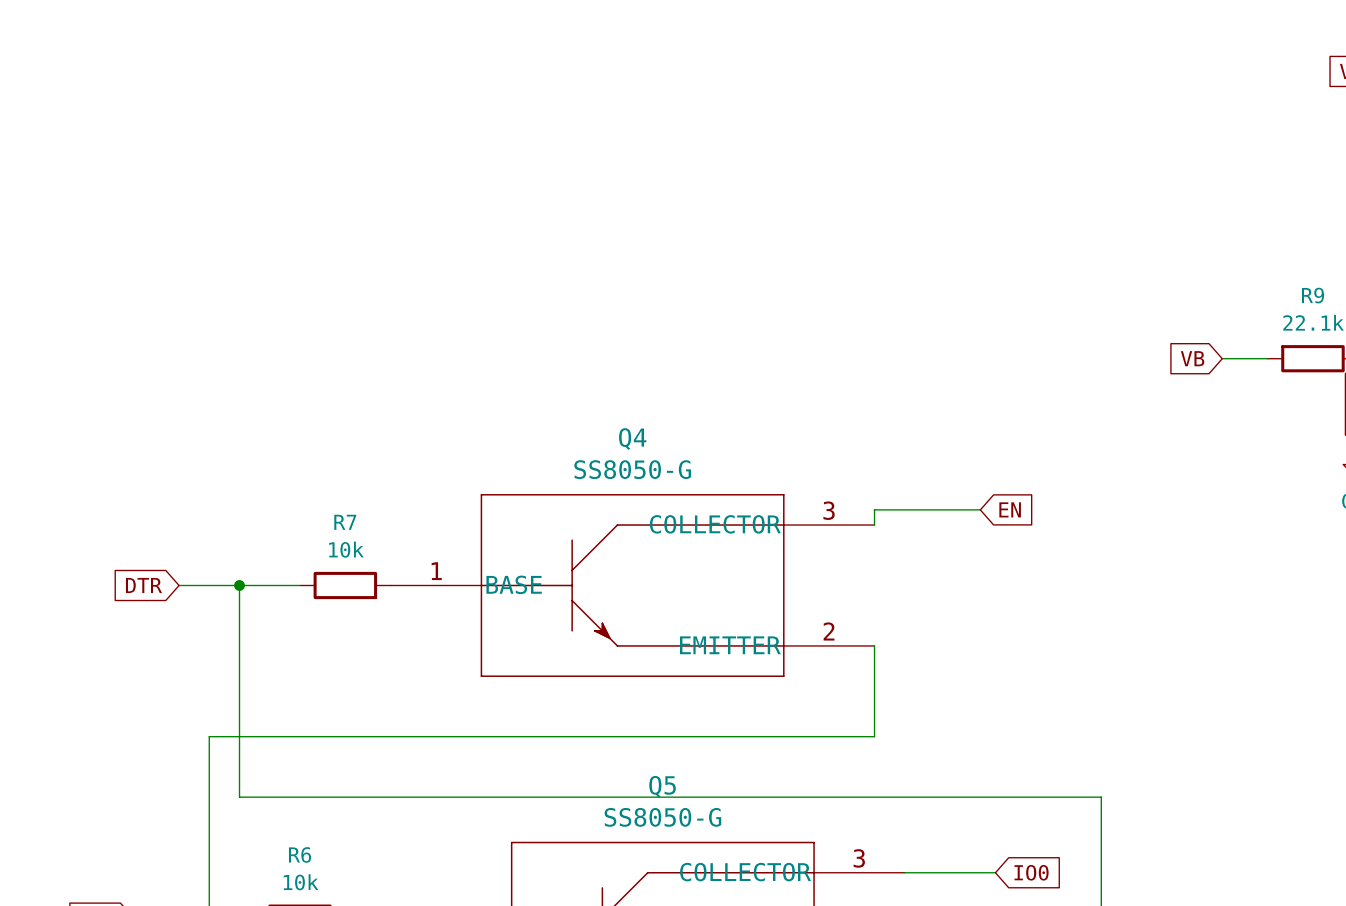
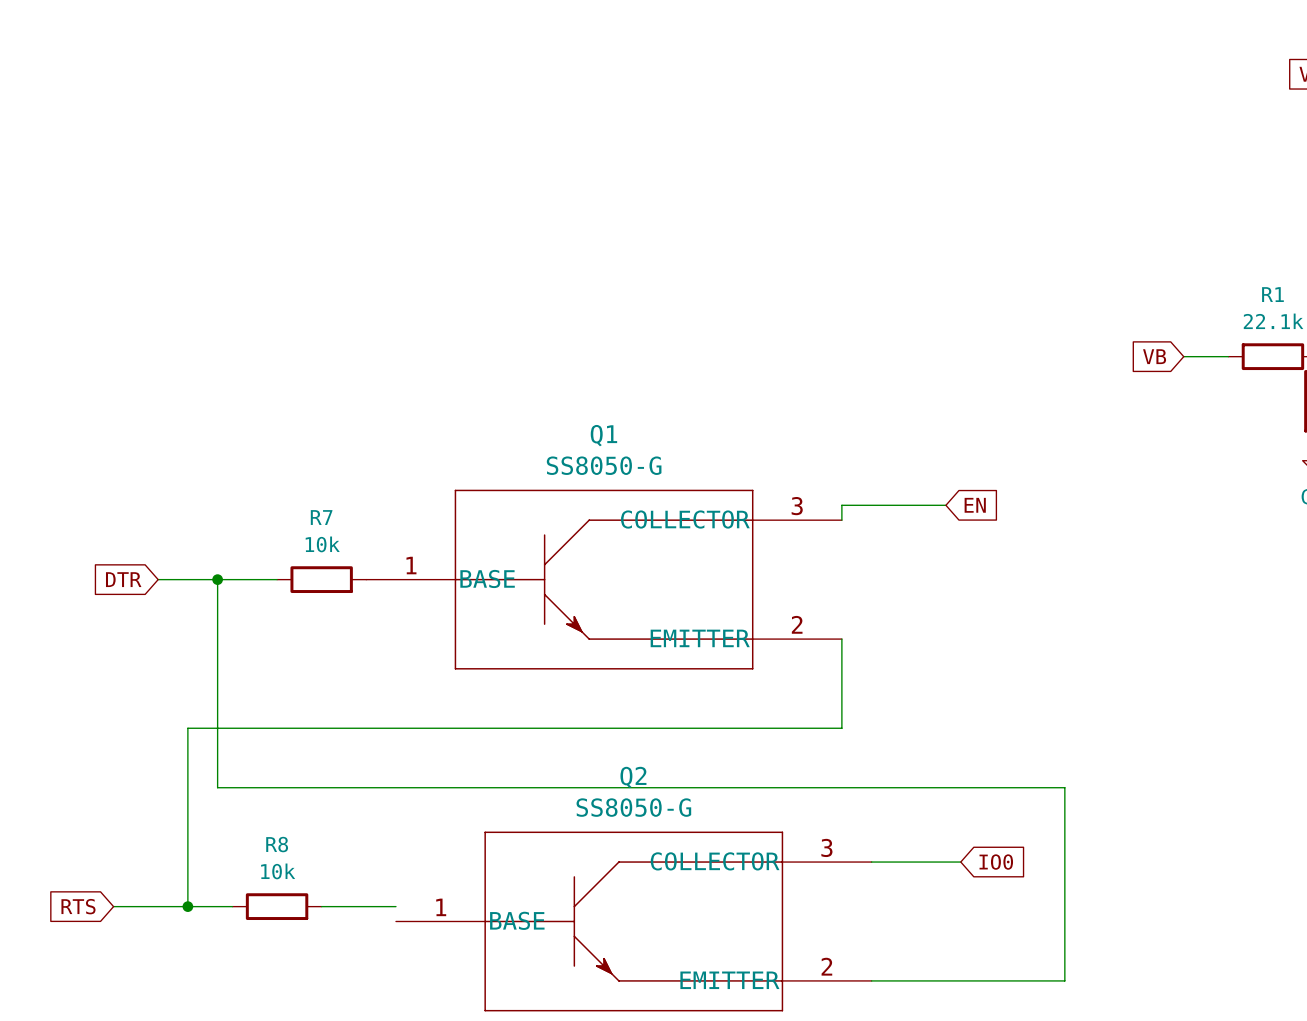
R9 name: R9 (1312, 295) -> R1 (1272, 294)
Q4 name: Q4 (632, 439) -> Q1 (603, 435)
Q5 name: Q5 (662, 786) -> Q2 (633, 777)
R6 name: R6 (300, 854) -> R8 (277, 844)

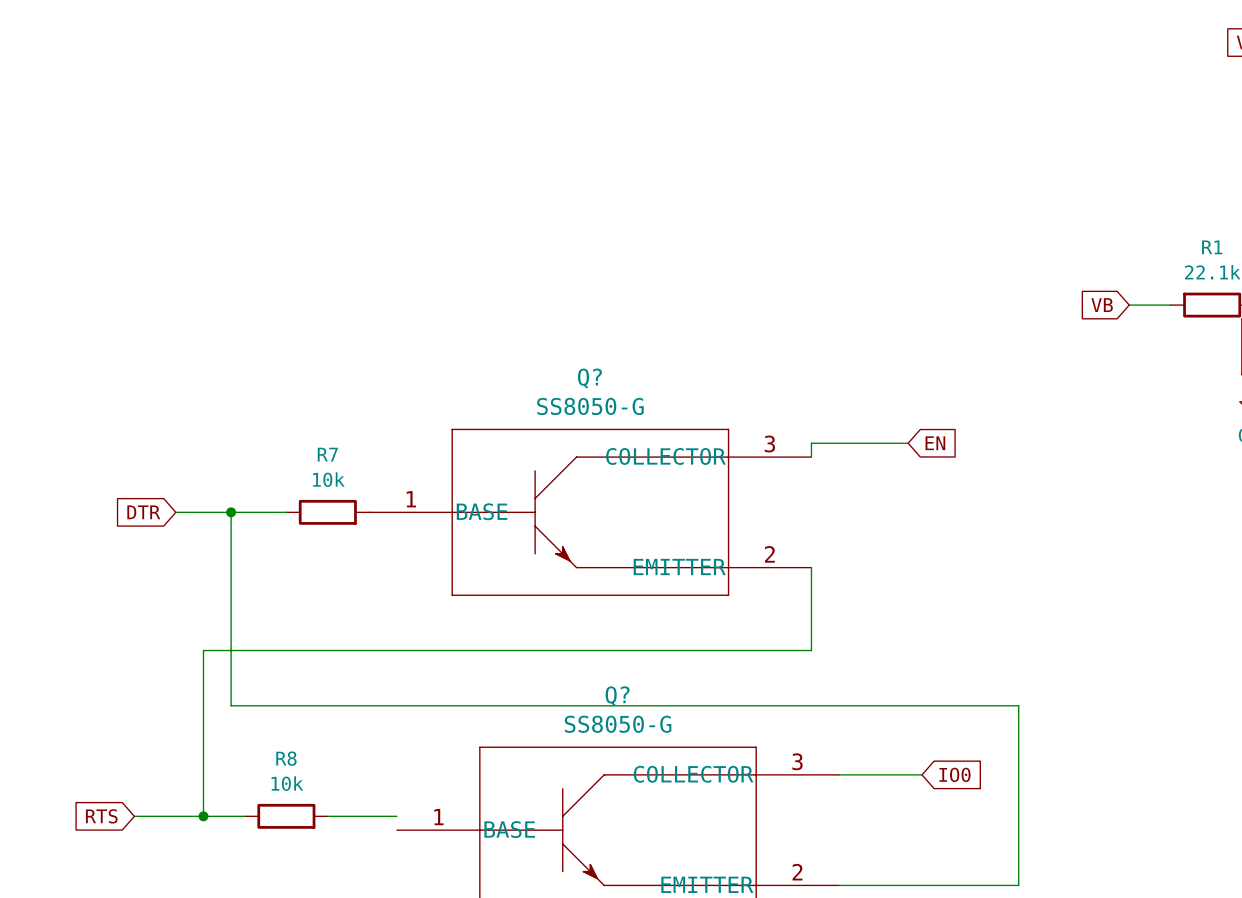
Q1 name: Q1 (603, 435) -> Q? (589, 378)
Q2 name: Q2 (633, 777) -> Q? (617, 696)

